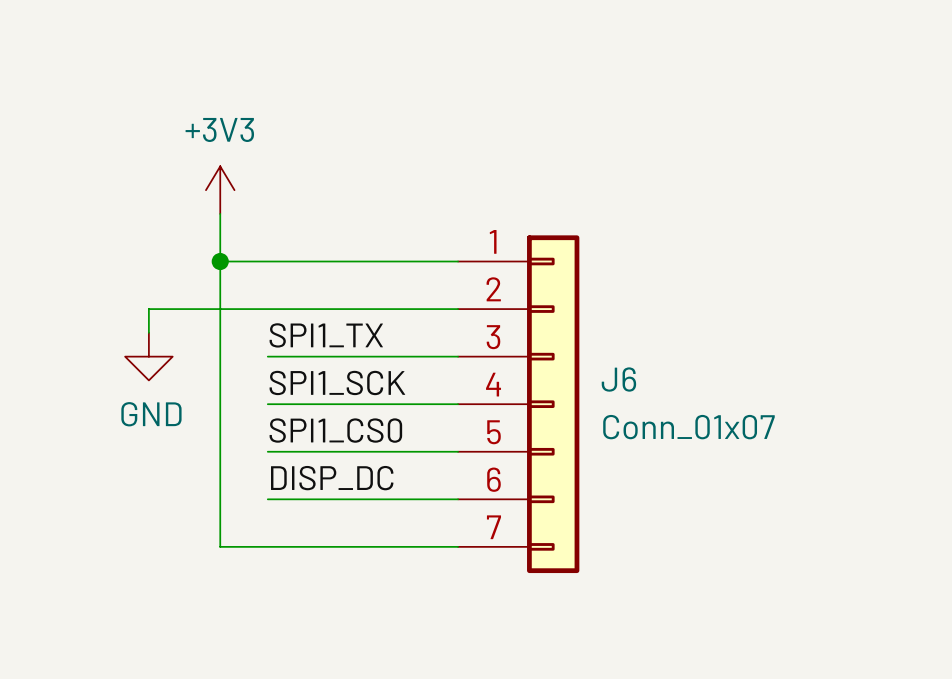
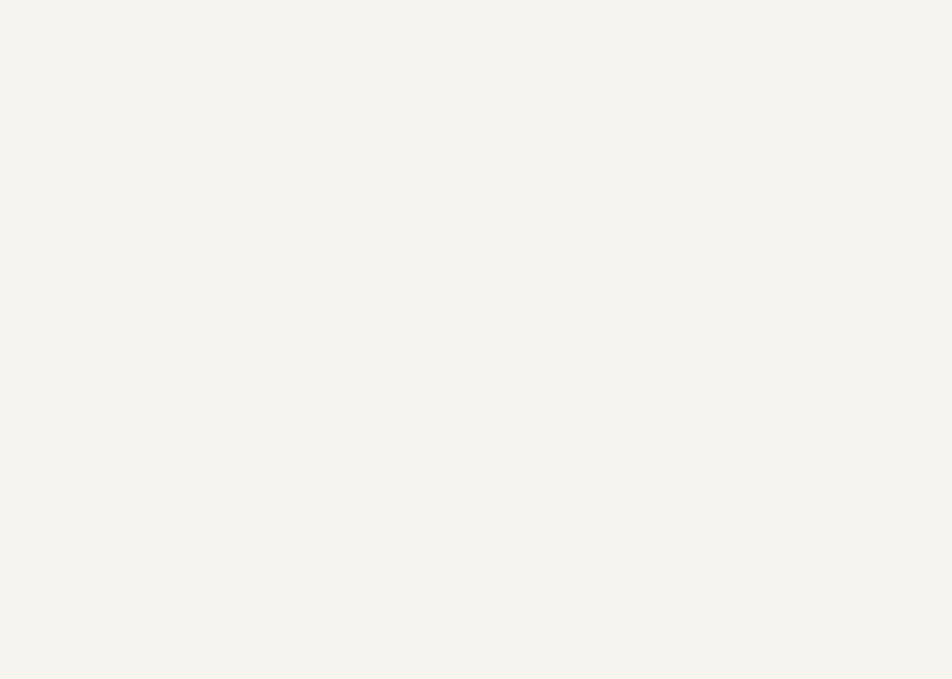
power symbol: +3V3 (220, 190) -> none
wire: (220, 213) (220, 546) (458, 546) -> none
wire: (220, 261) (458, 261) -> none
junction: (220, 261) -> none
wire: (458, 309) (148, 309) (148, 332) -> none
label: SPI1_TX (326, 335) -> none
power symbol: GND (148, 356) -> none
wire: (267, 356) (458, 356) -> none
label: SPI1_SCK (337, 382) -> none
wire: (267, 404) (458, 404) -> none
J6: Conn_01x07 (518, 404) -> none
label: SPI1_CS0 (335, 430) -> none
wire: (267, 451) (458, 451) -> none
label: DISP_DC (332, 478) -> none
wire: (267, 499) (458, 499) -> none

